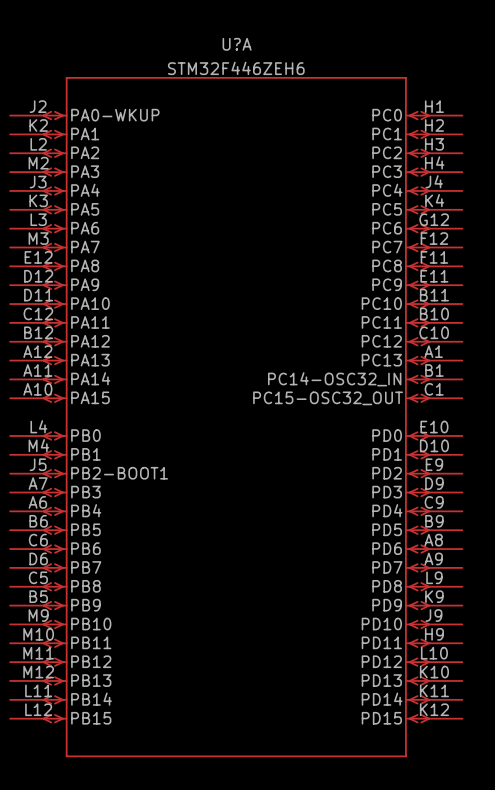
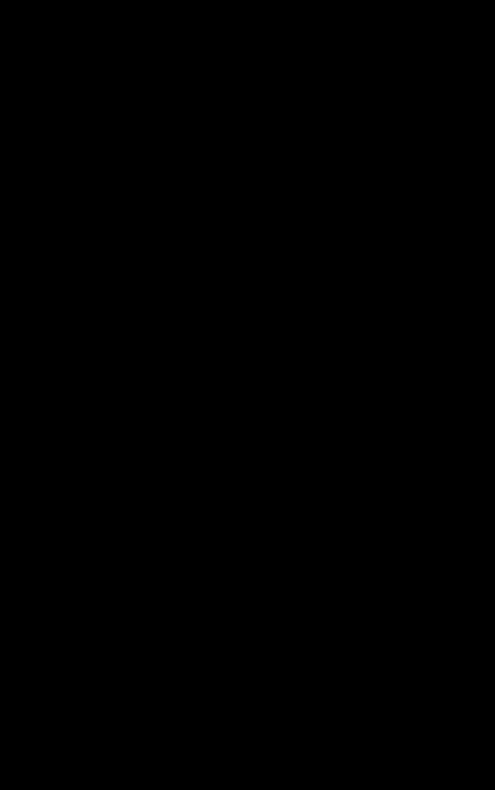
U?A: STM32F446ZEH6 (236, 417) -> none

